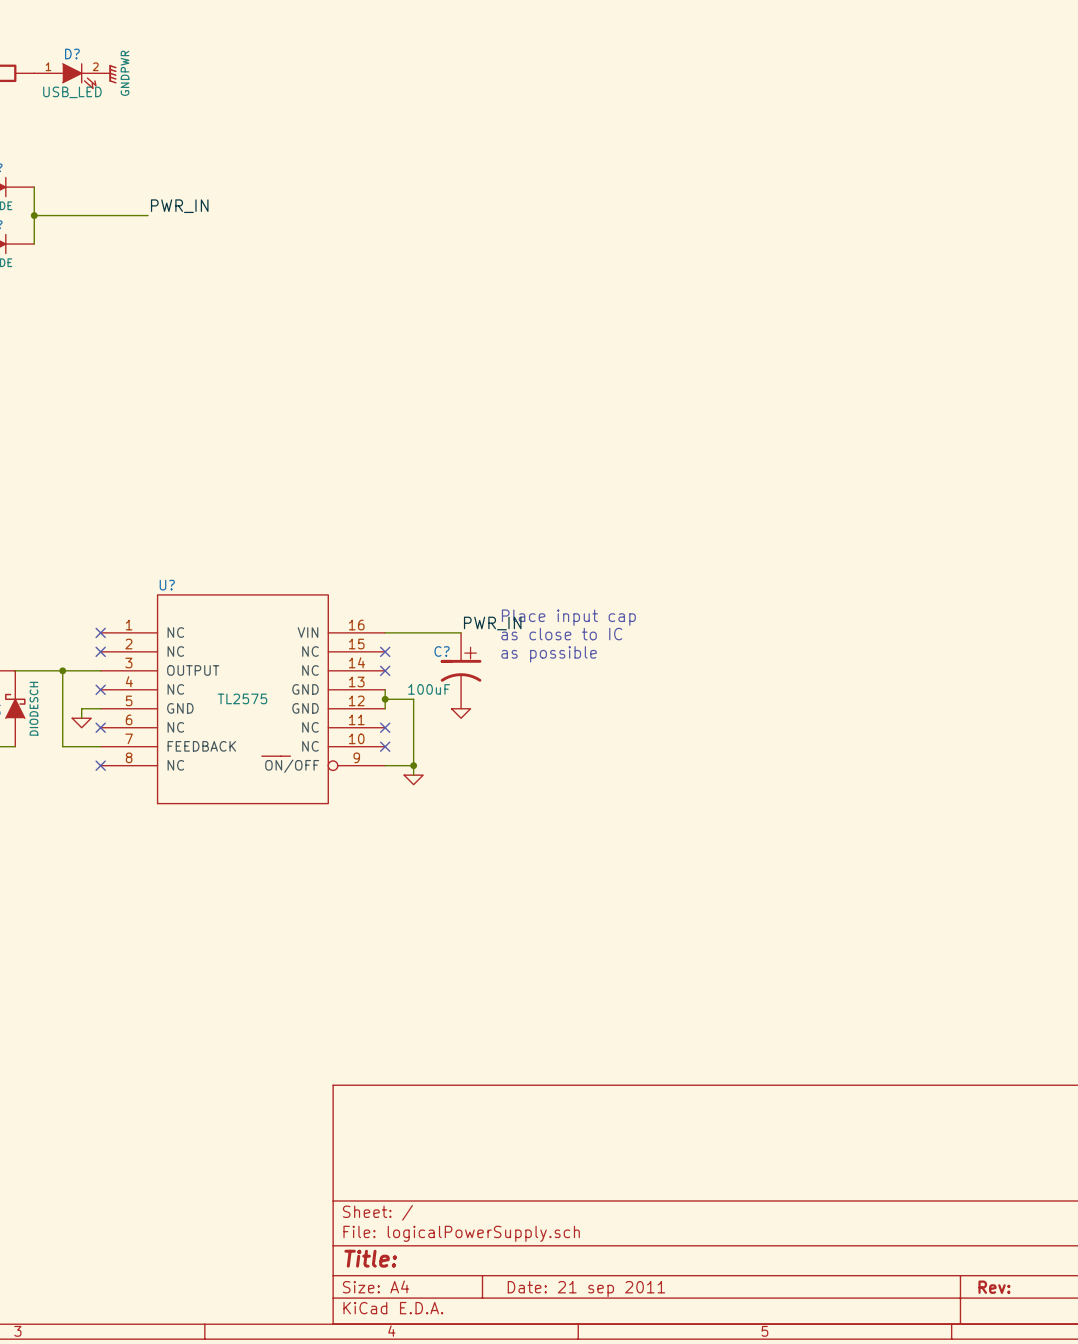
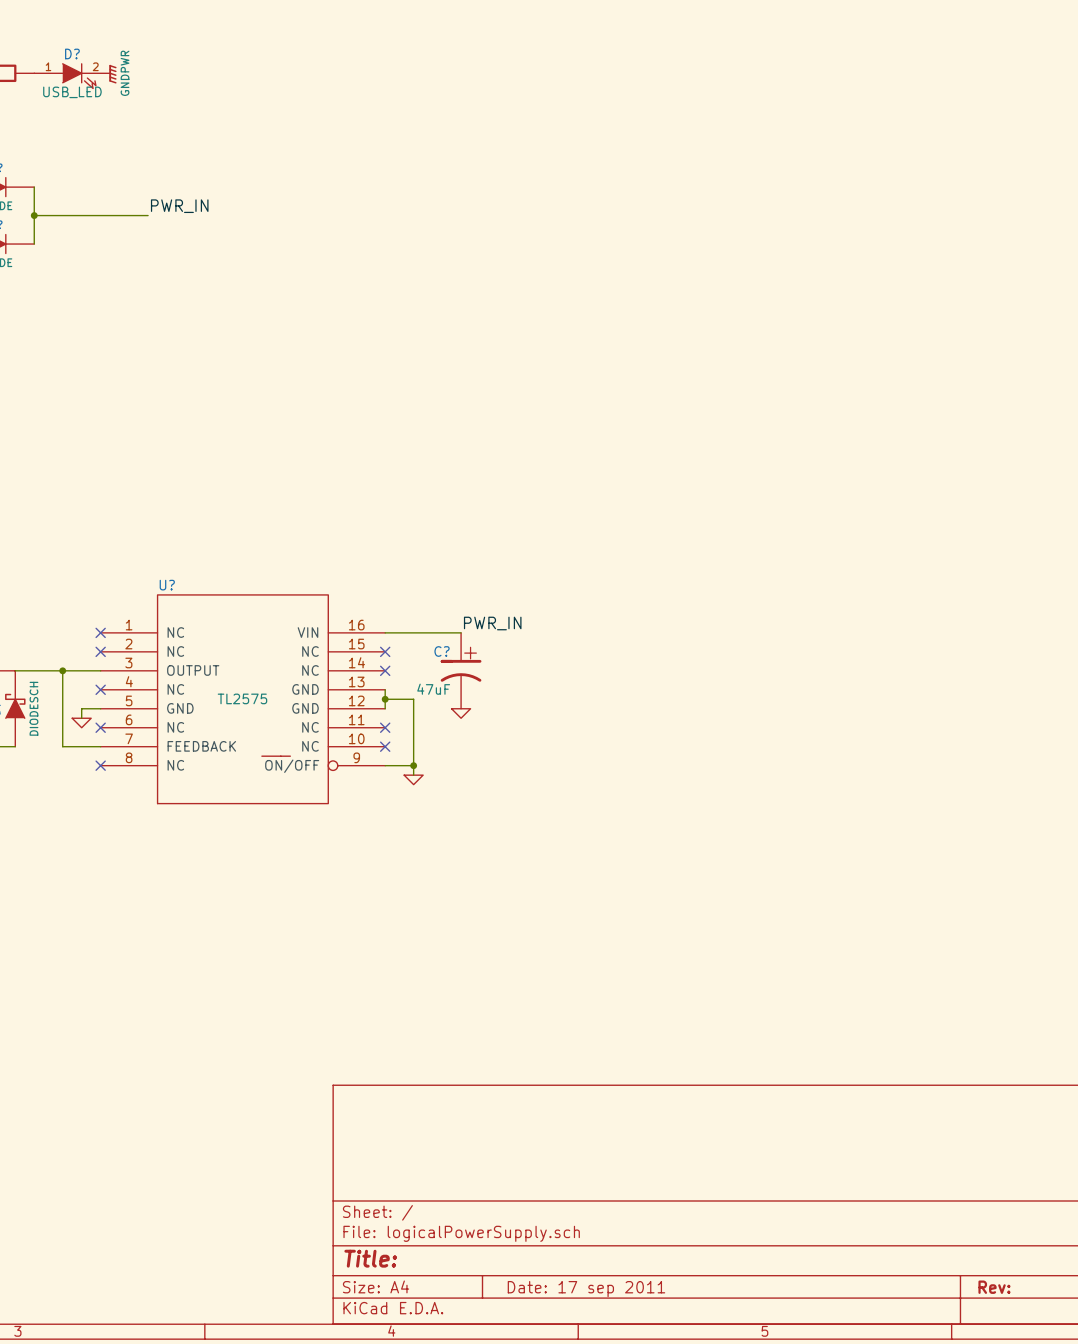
text: Place input cap (568, 617) -> none
text: as close to IC (561, 634) -> none
text: as possible (549, 654) -> none
C? value: 100uF (429, 689) -> 47uF (433, 689)
title block: Date: 21 sep 2011 (586, 1289) -> Date: 17 sep 2011 (586, 1289)

